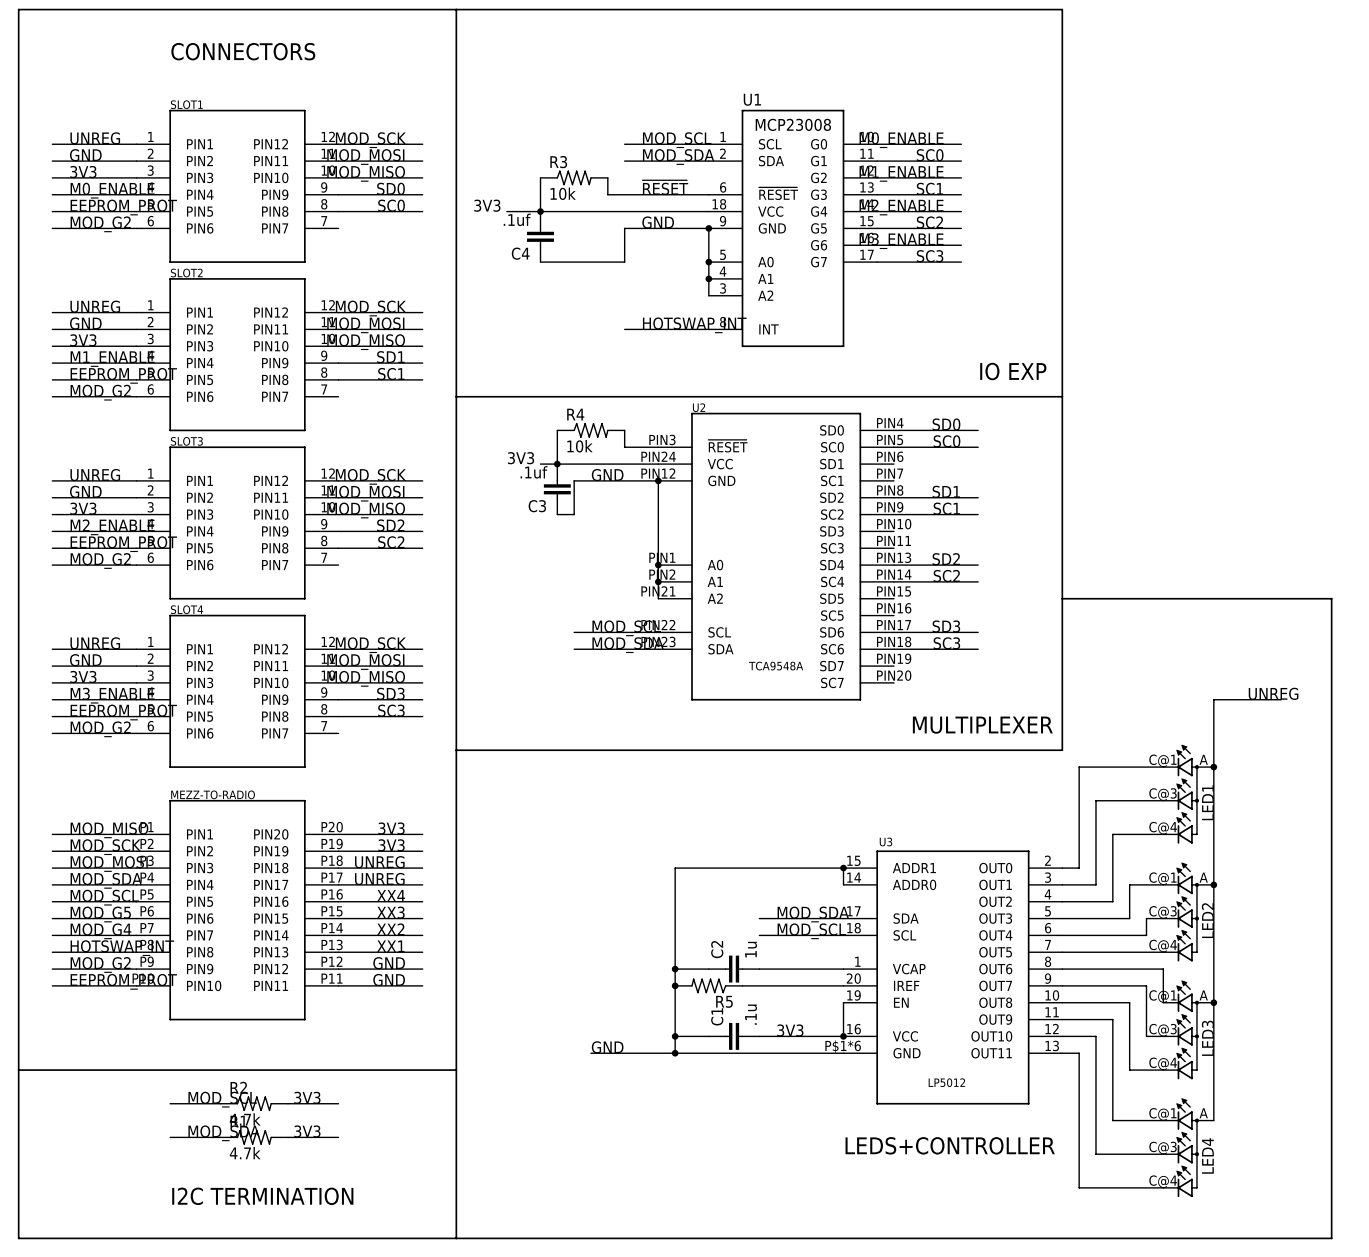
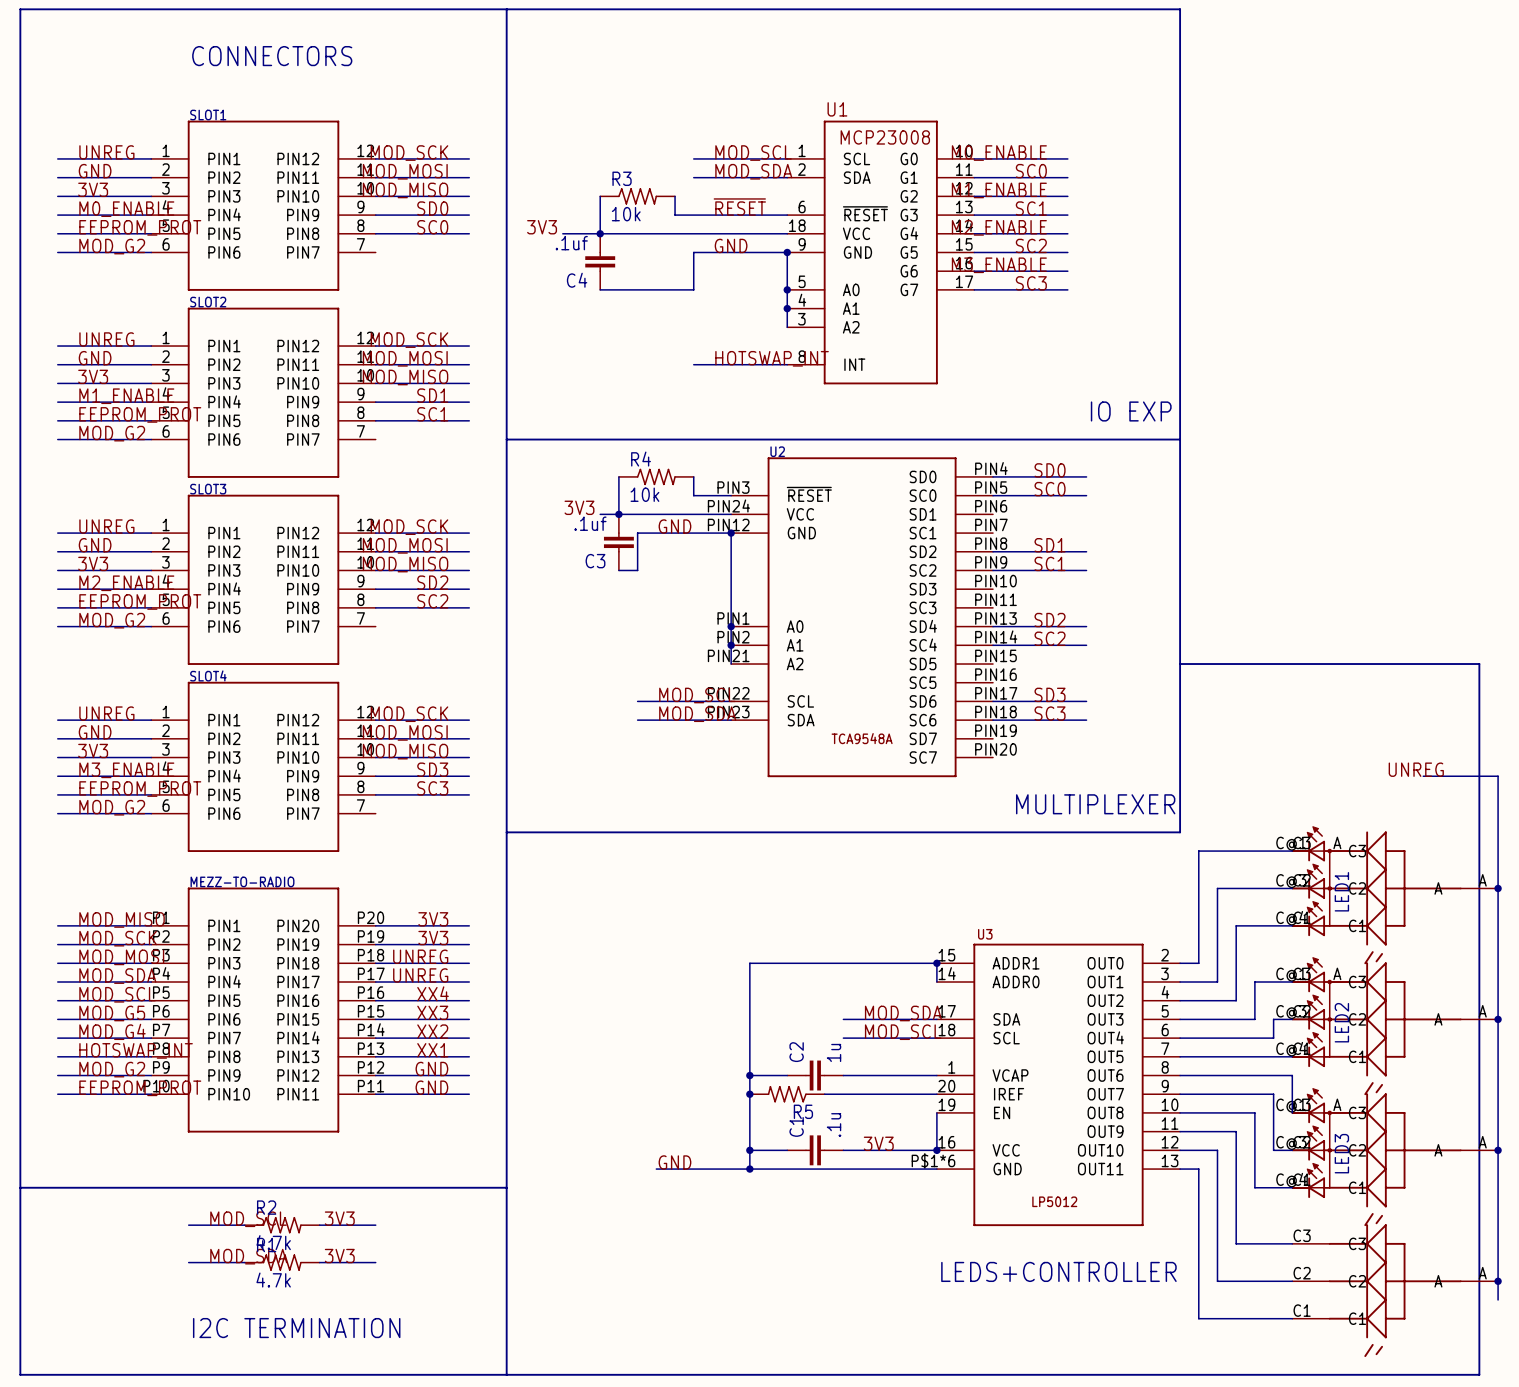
wire: (1281, 699) (1213, 699) (1213, 1120) -> (1423, 776) (1498, 776) (1498, 1299)
junction: (1213, 767) -> none
junction: none -> (1498, 888)
part: none -> (1395, 897)
junction: (1213, 884) -> none
junction: none -> (1498, 1019)
part: none -> (1395, 1028)
junction: (1213, 1002) -> none
junction: none -> (1498, 1150)
part: none -> (1395, 1159)
LED4: (1188, 1147) -> none
junction: none -> (1498, 1281)
part: none -> (1395, 1290)

